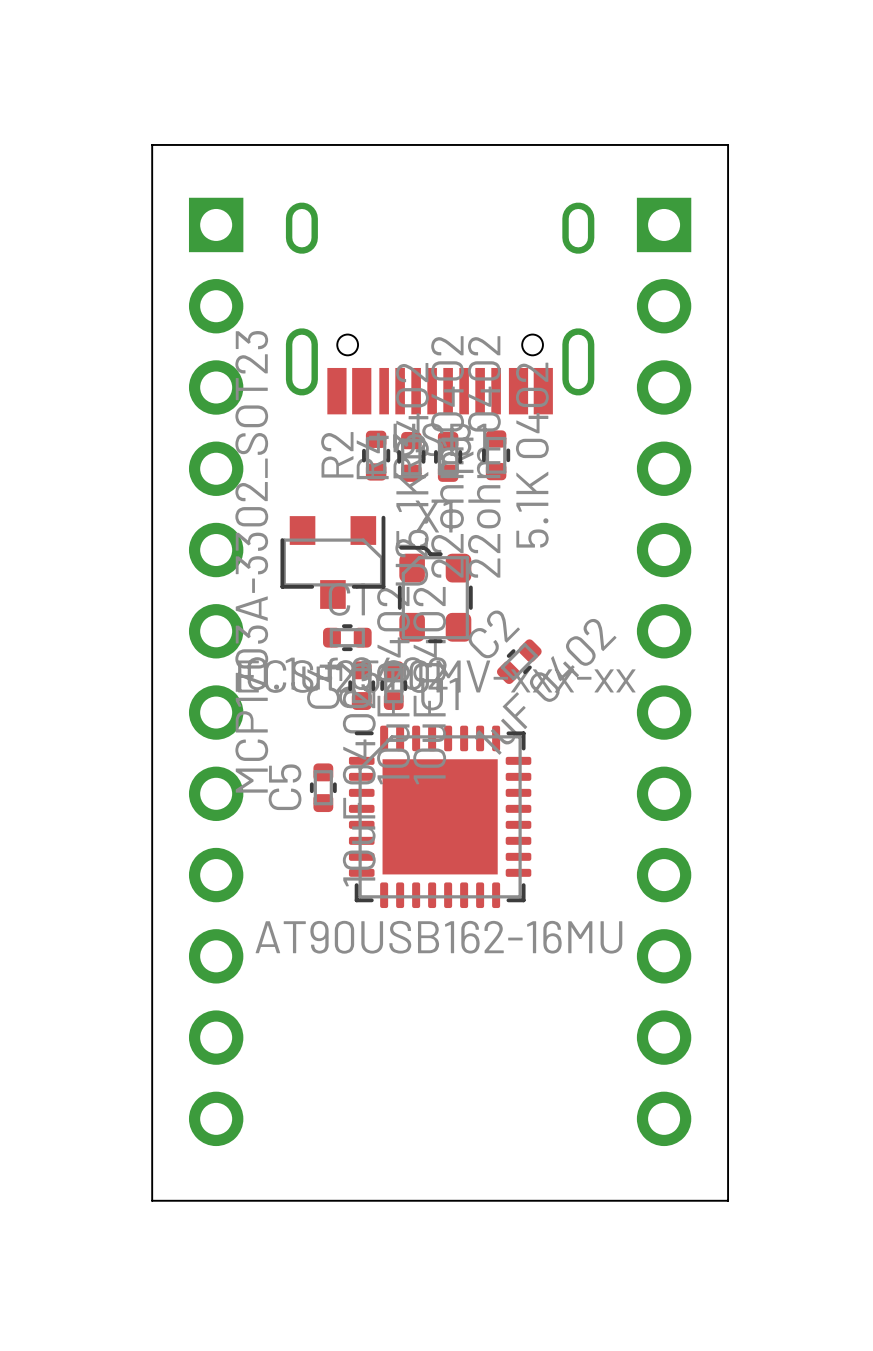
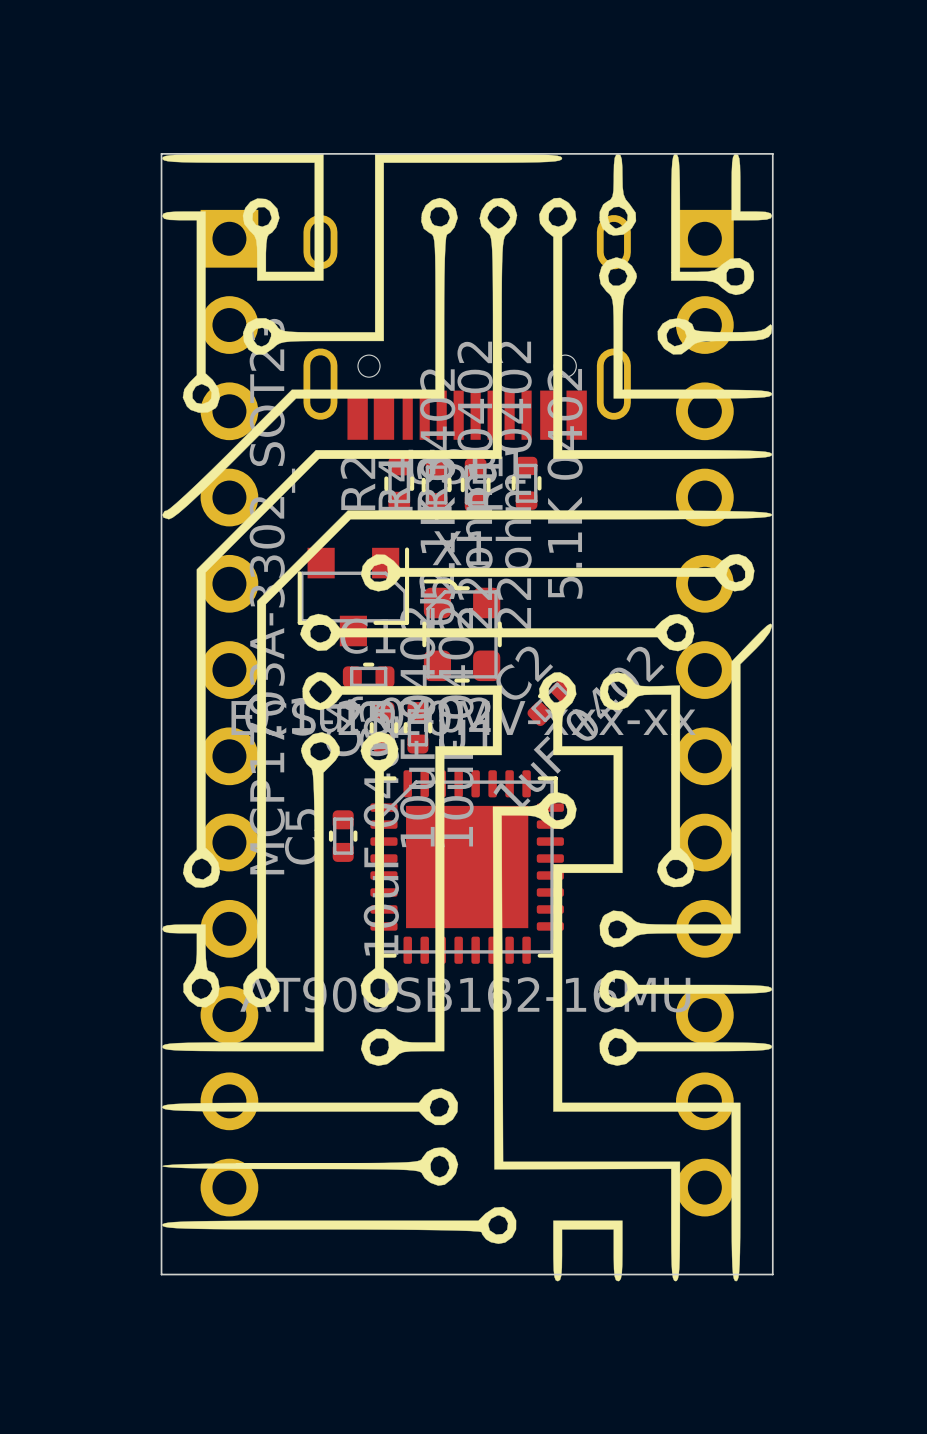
drawing: none -> [162, 153, 773, 1282]

